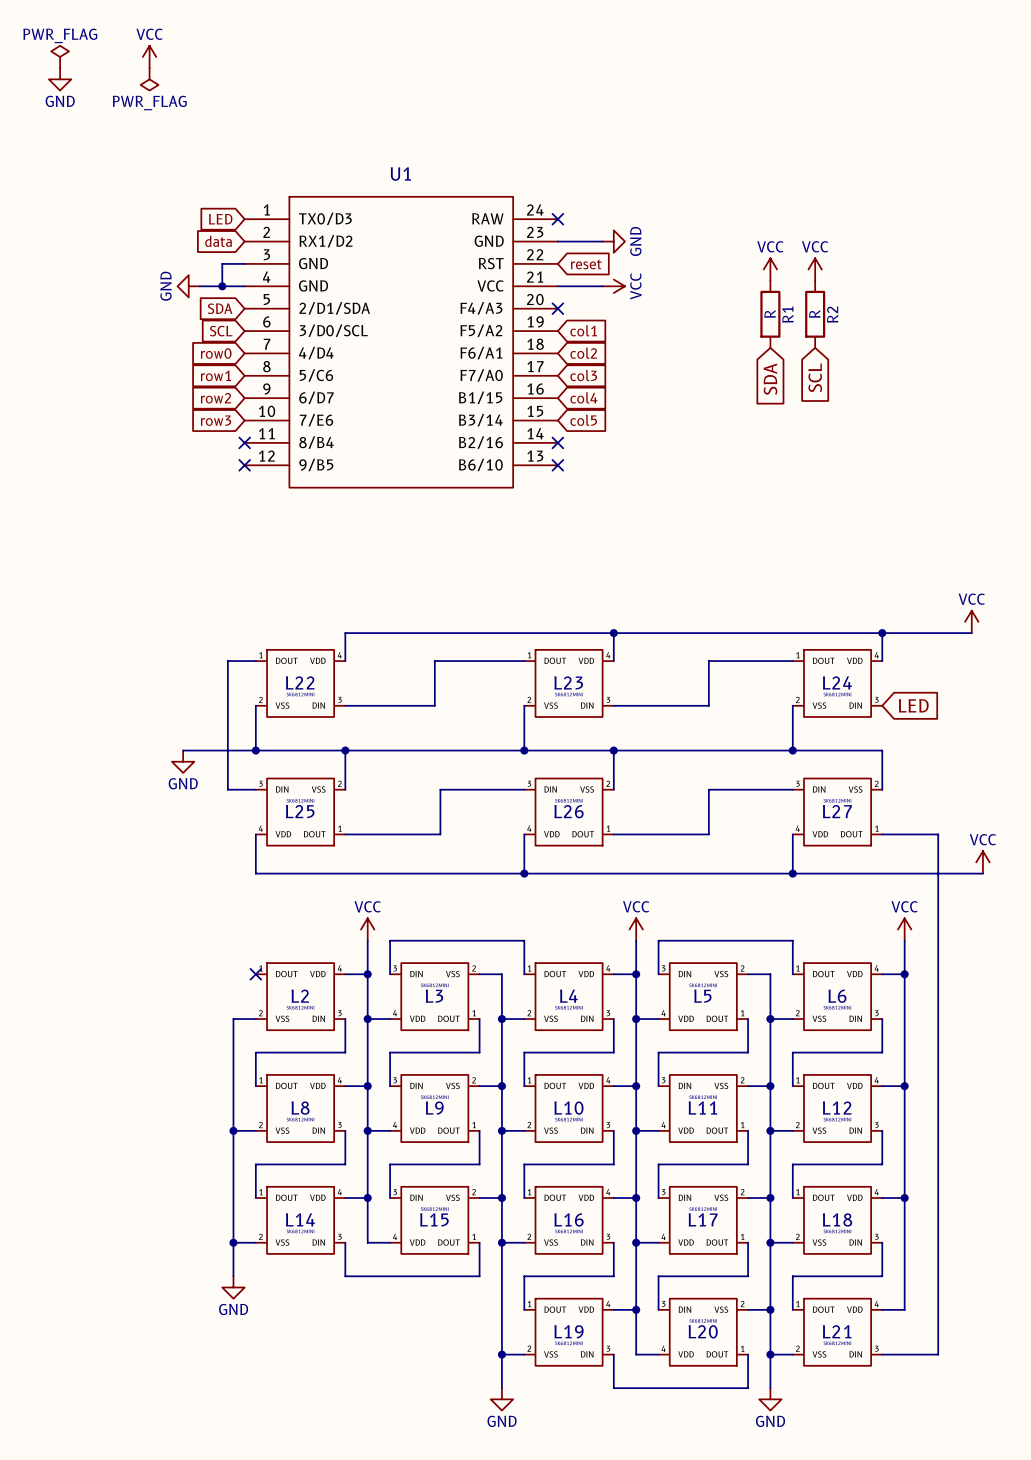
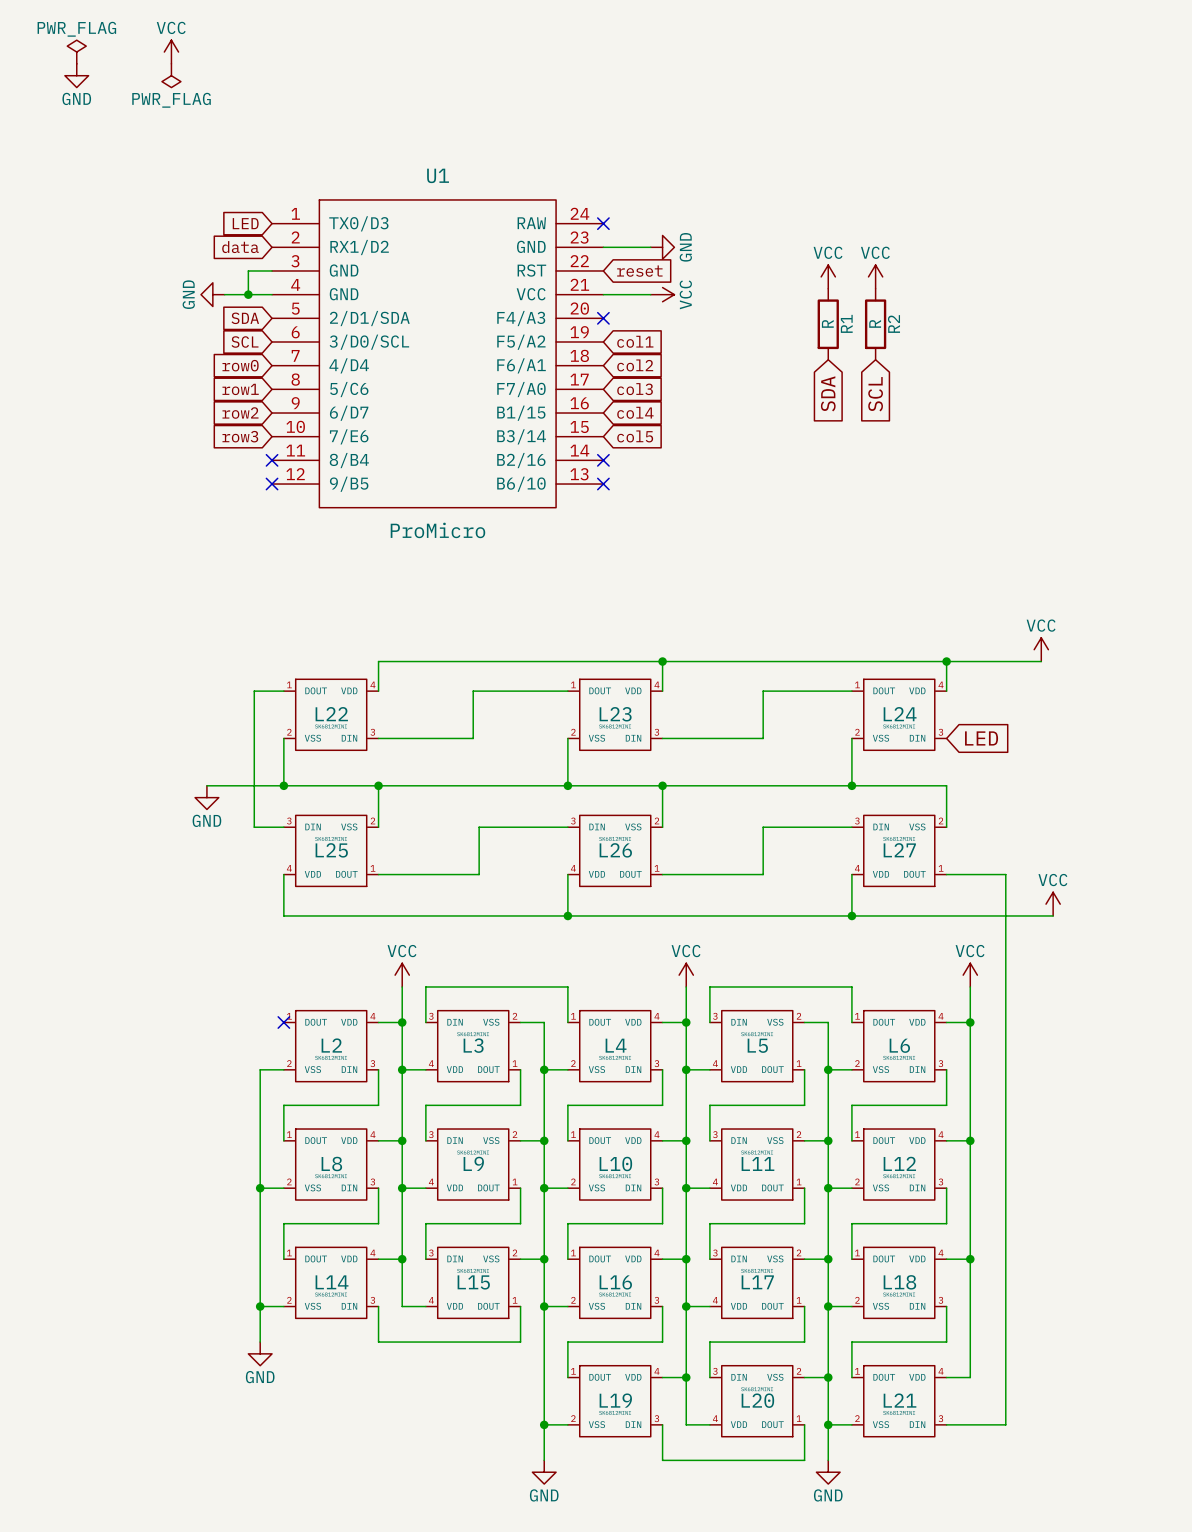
U1 value: none -> ProMicro (437, 530)

